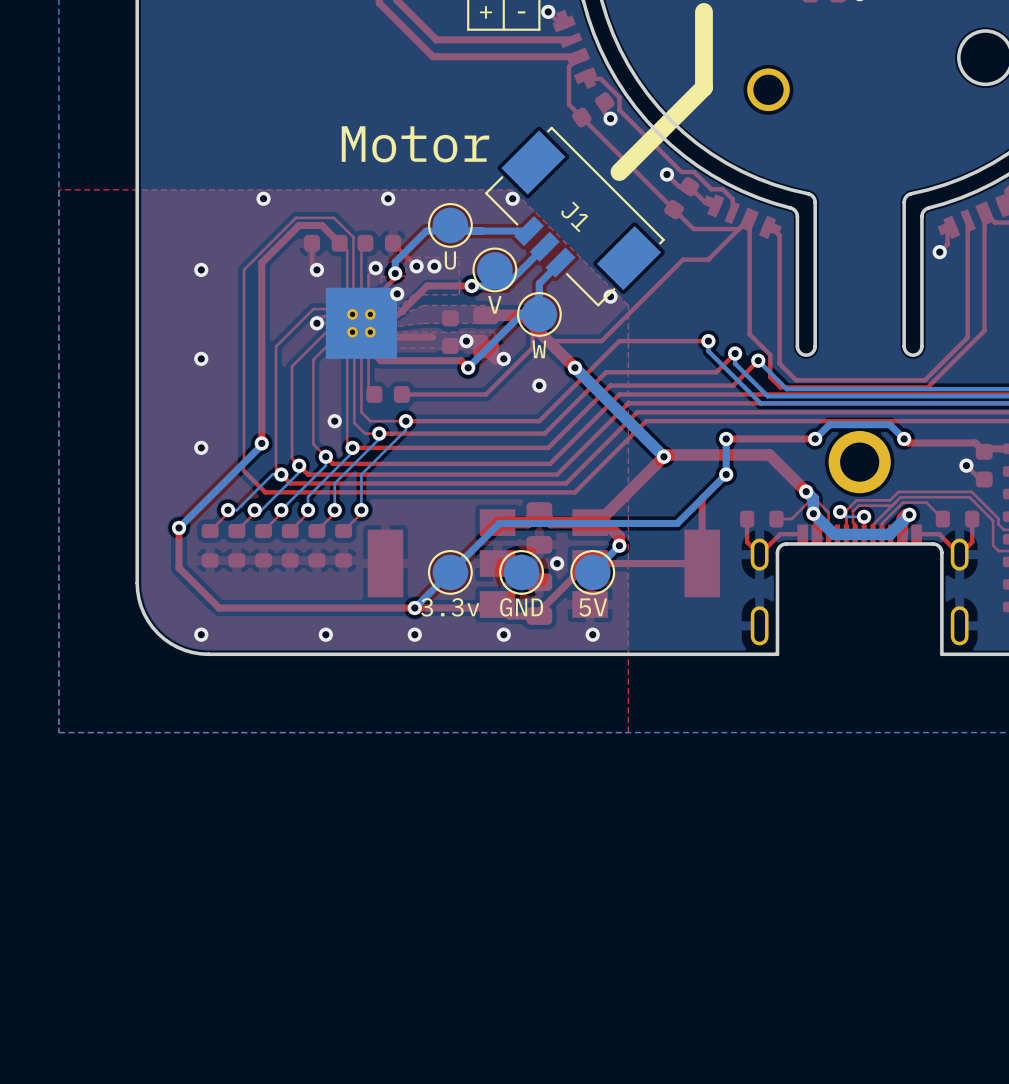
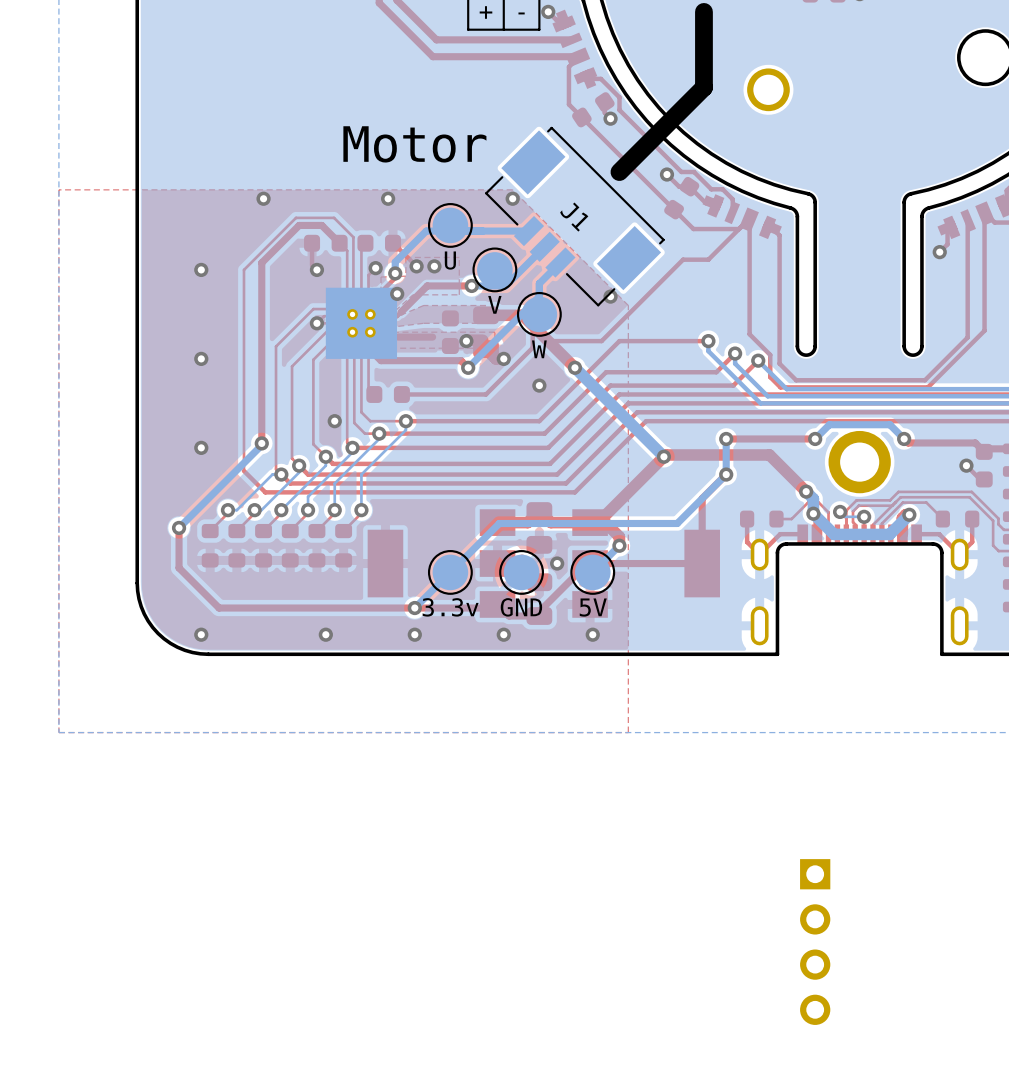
part: none -> (815, 942)

